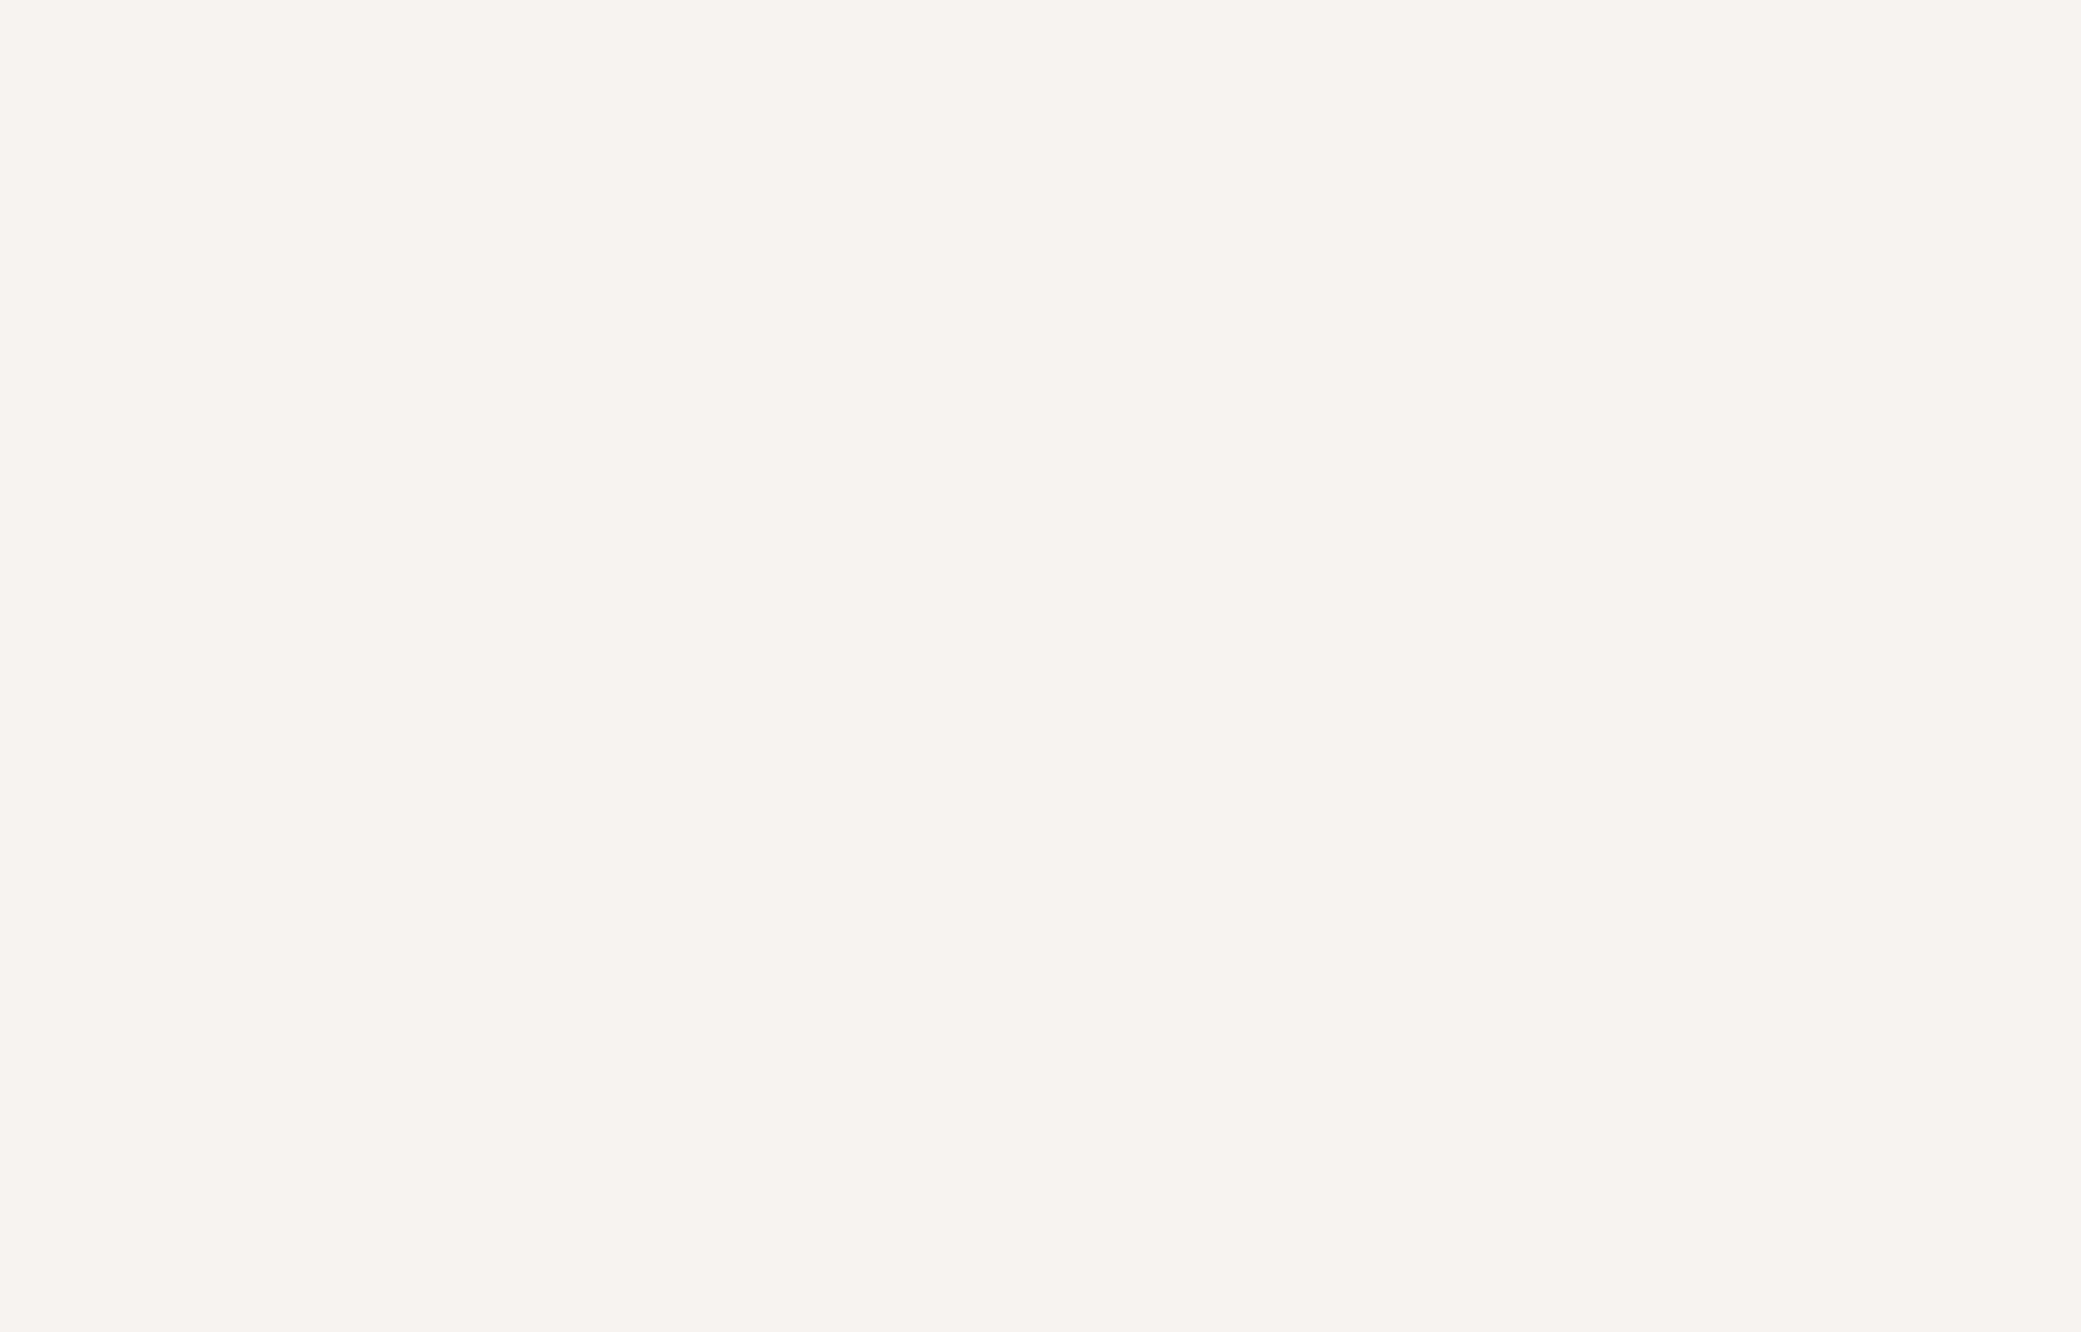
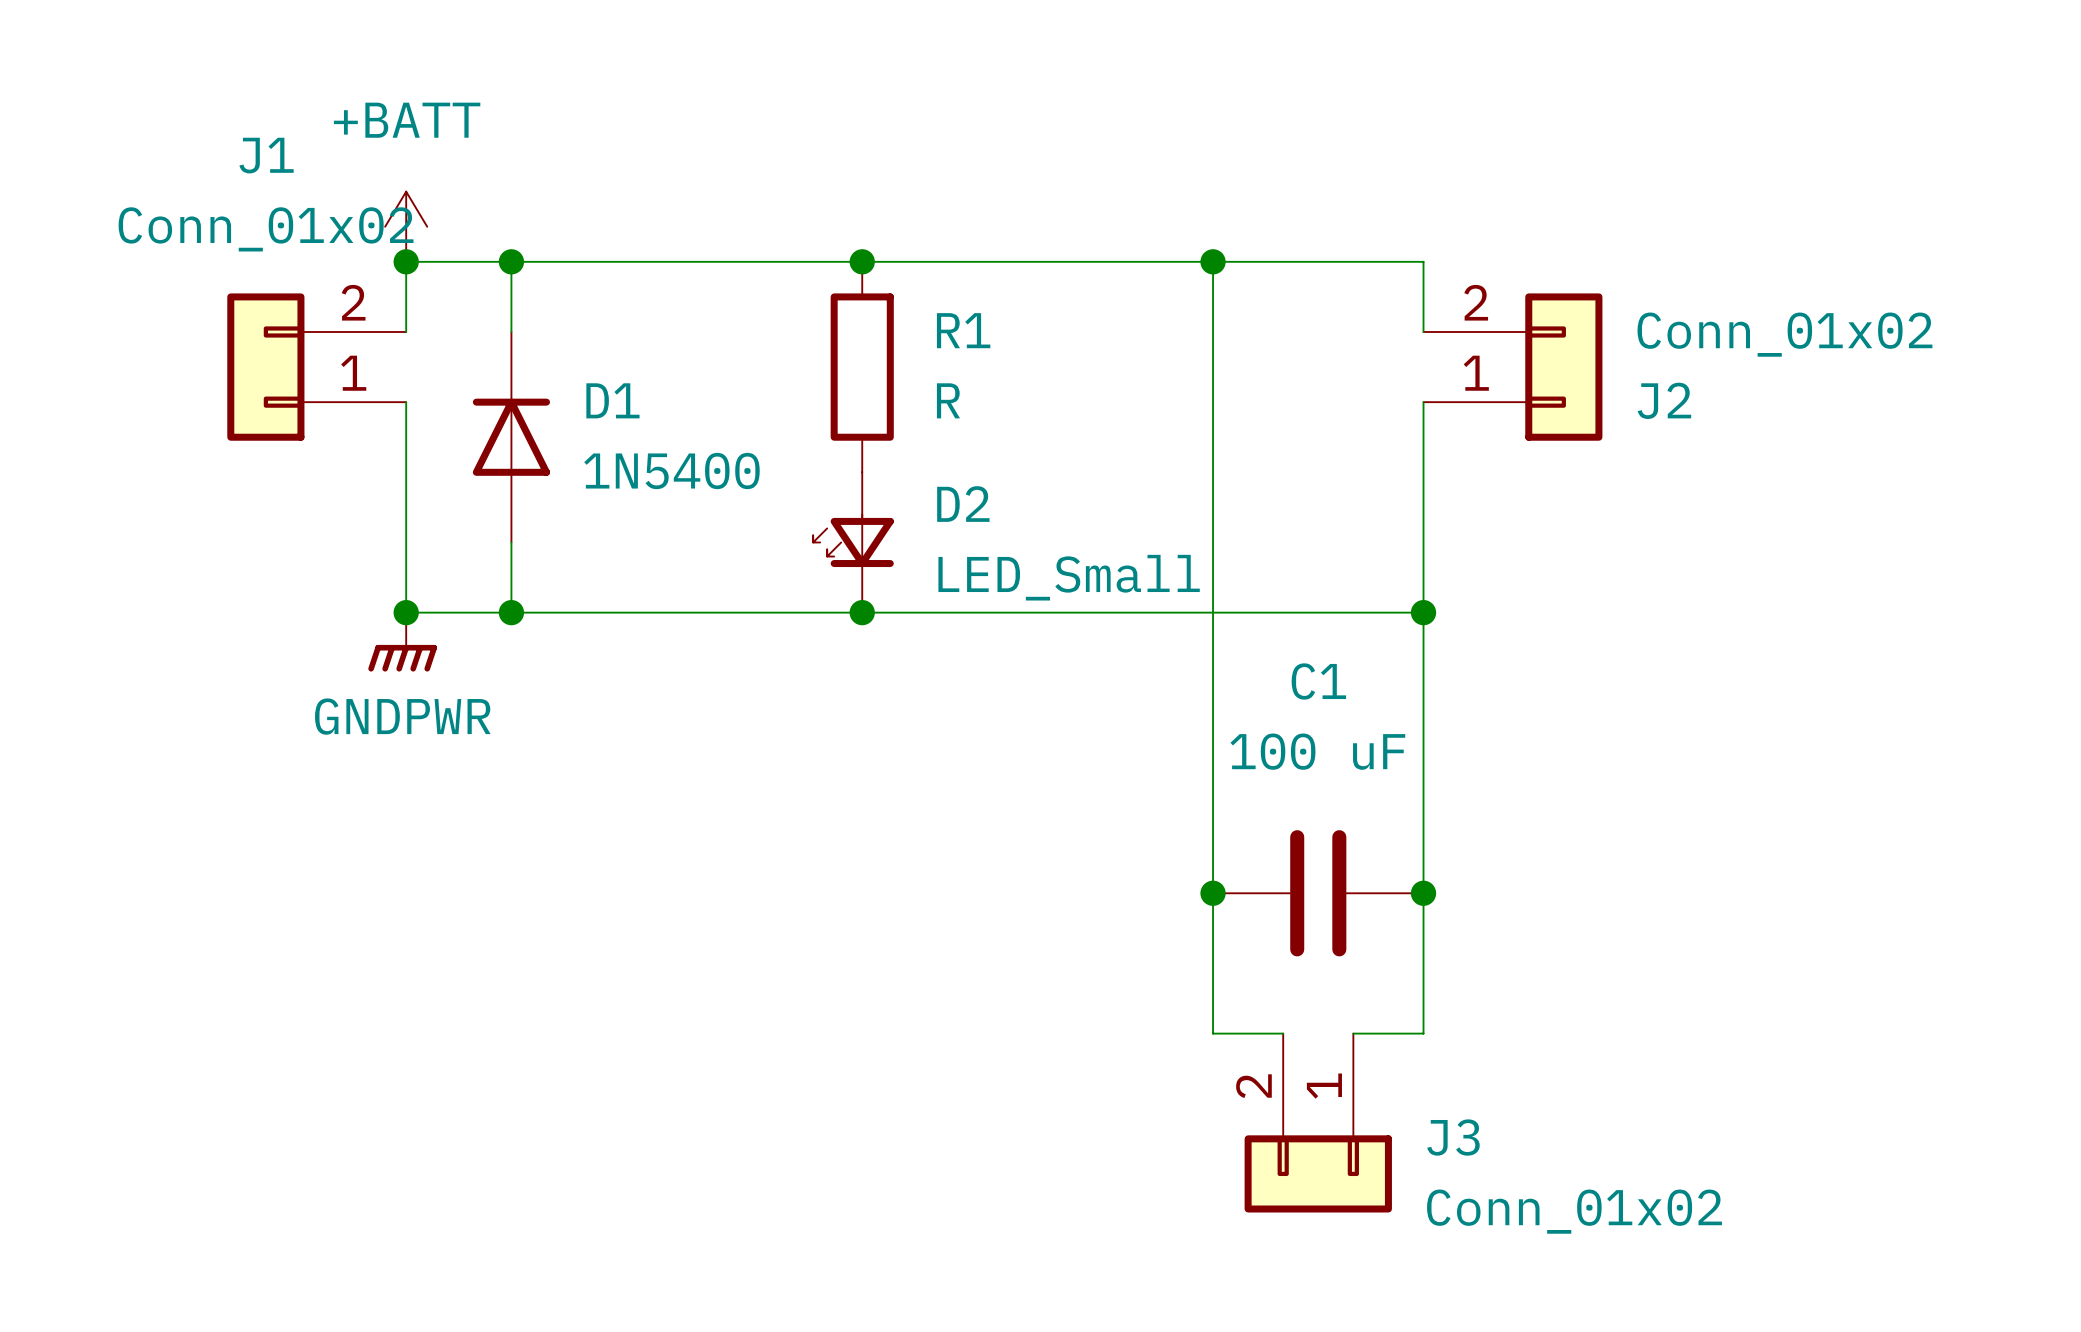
power symbol: none -> +BATT (406, 226)
junction: none -> (406, 261)
wire: none -> (511, 261) (511, 331)
junction: none -> (511, 261)
junction: none -> (862, 261)
wire: none -> (1213, 261) (1213, 1033) (1283, 1033)
junction: none -> (1213, 261)
wire: none -> (406, 331) (406, 261) (1423, 261) (1423, 331)
J1: none -> Conn_01x02 (316, 367)
R1: none -> R (862, 367)
J2: none -> Conn_01x02 (1512, 367)
wire: none -> (406, 402) (406, 612) (1423, 612)
wire: none -> (1423, 402) (1423, 1033) (1353, 1033)
D1: none -> 1N5400 (511, 437)
wire: none -> (511, 542) (511, 612)
D2: none -> LED_Small (853, 542)
junction: none -> (406, 612)
junction: none -> (511, 612)
junction: none -> (862, 612)
junction: none -> (1423, 612)
power symbol: none -> GNDPWR (402, 642)
junction: none -> (1213, 893)
C1: none -> 100 uF (1318, 893)
junction: none -> (1423, 893)
J3: none -> Conn_01x02 (1318, 1123)

